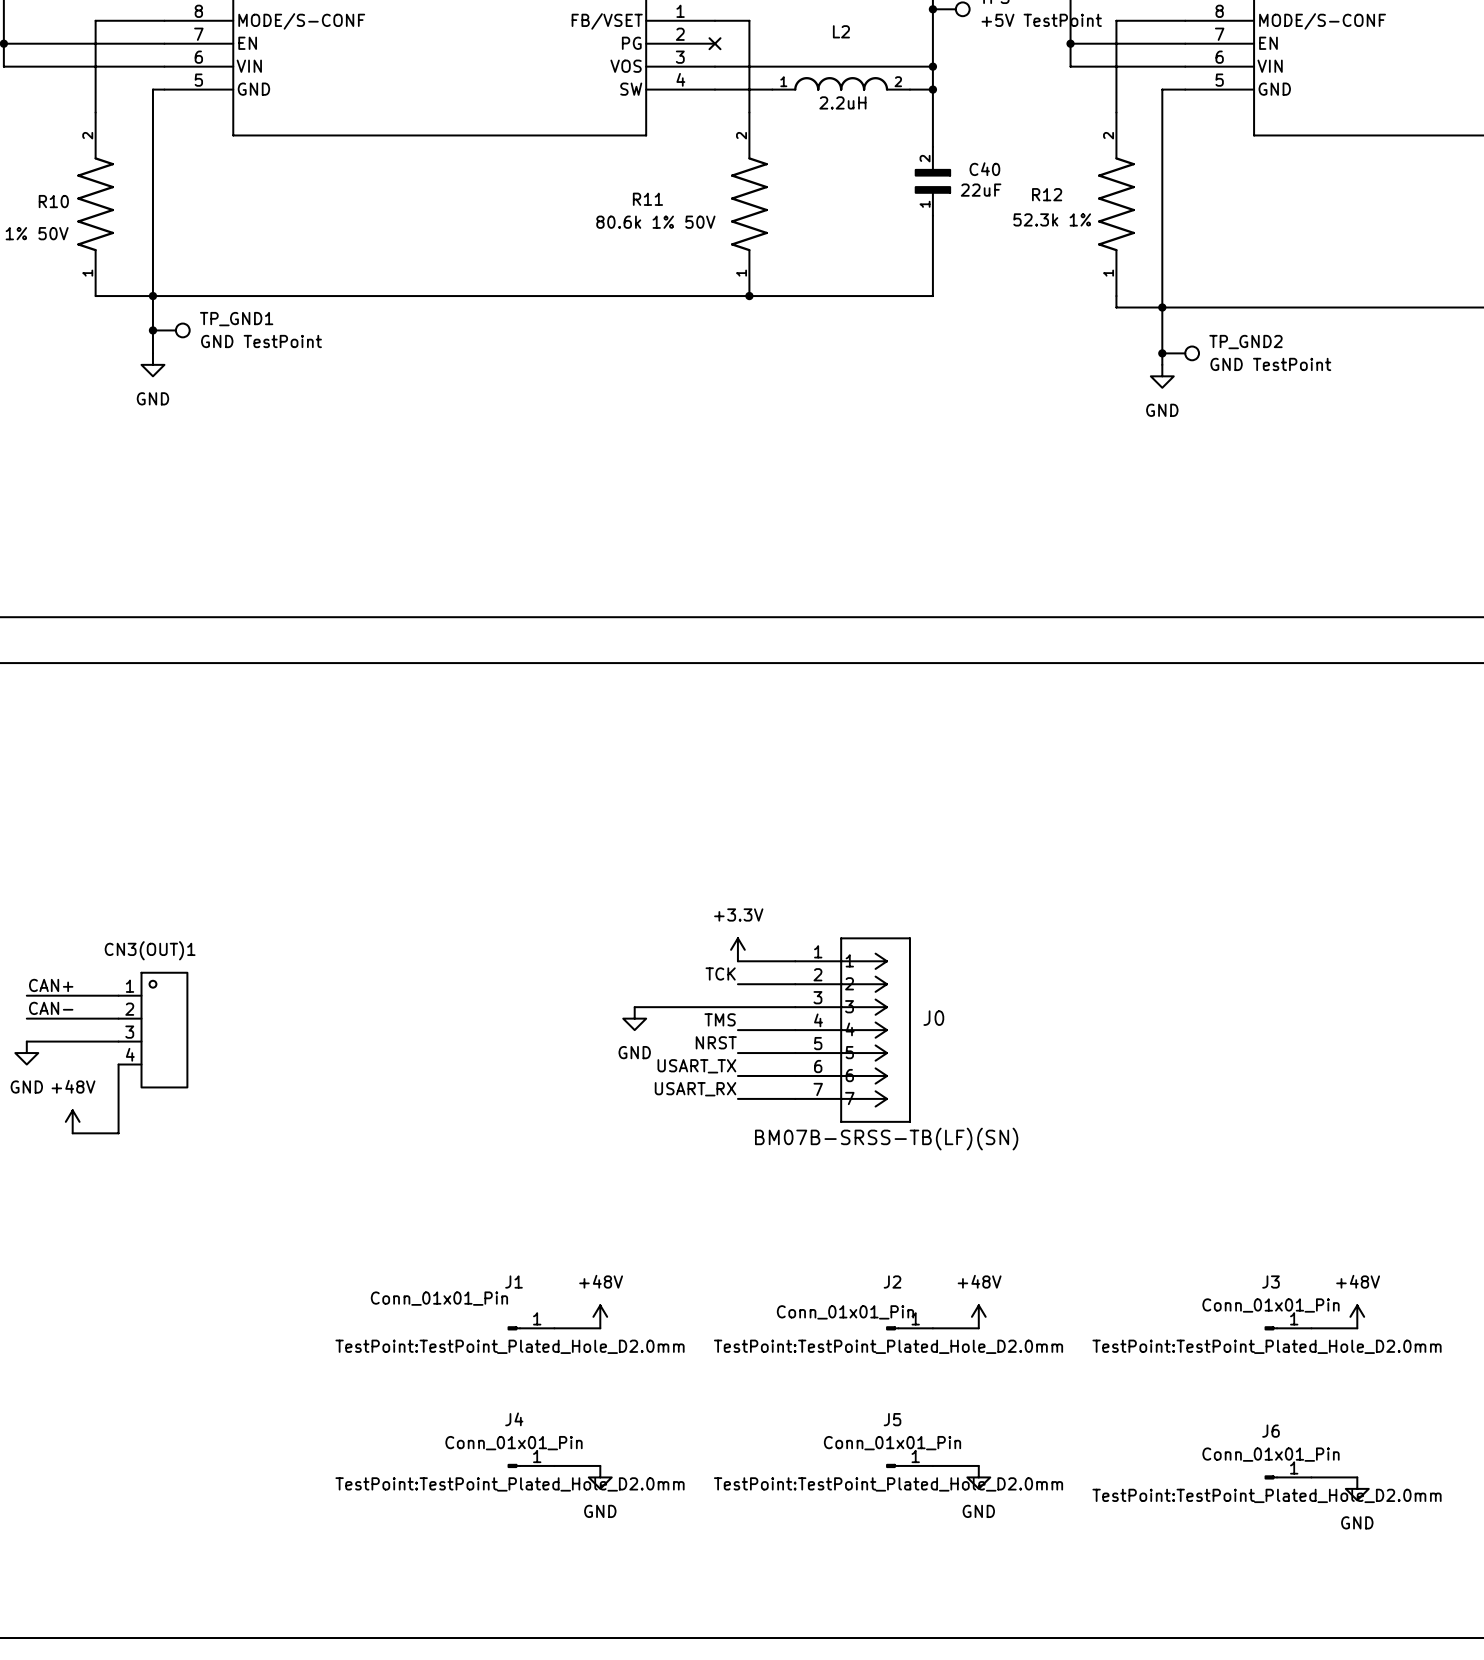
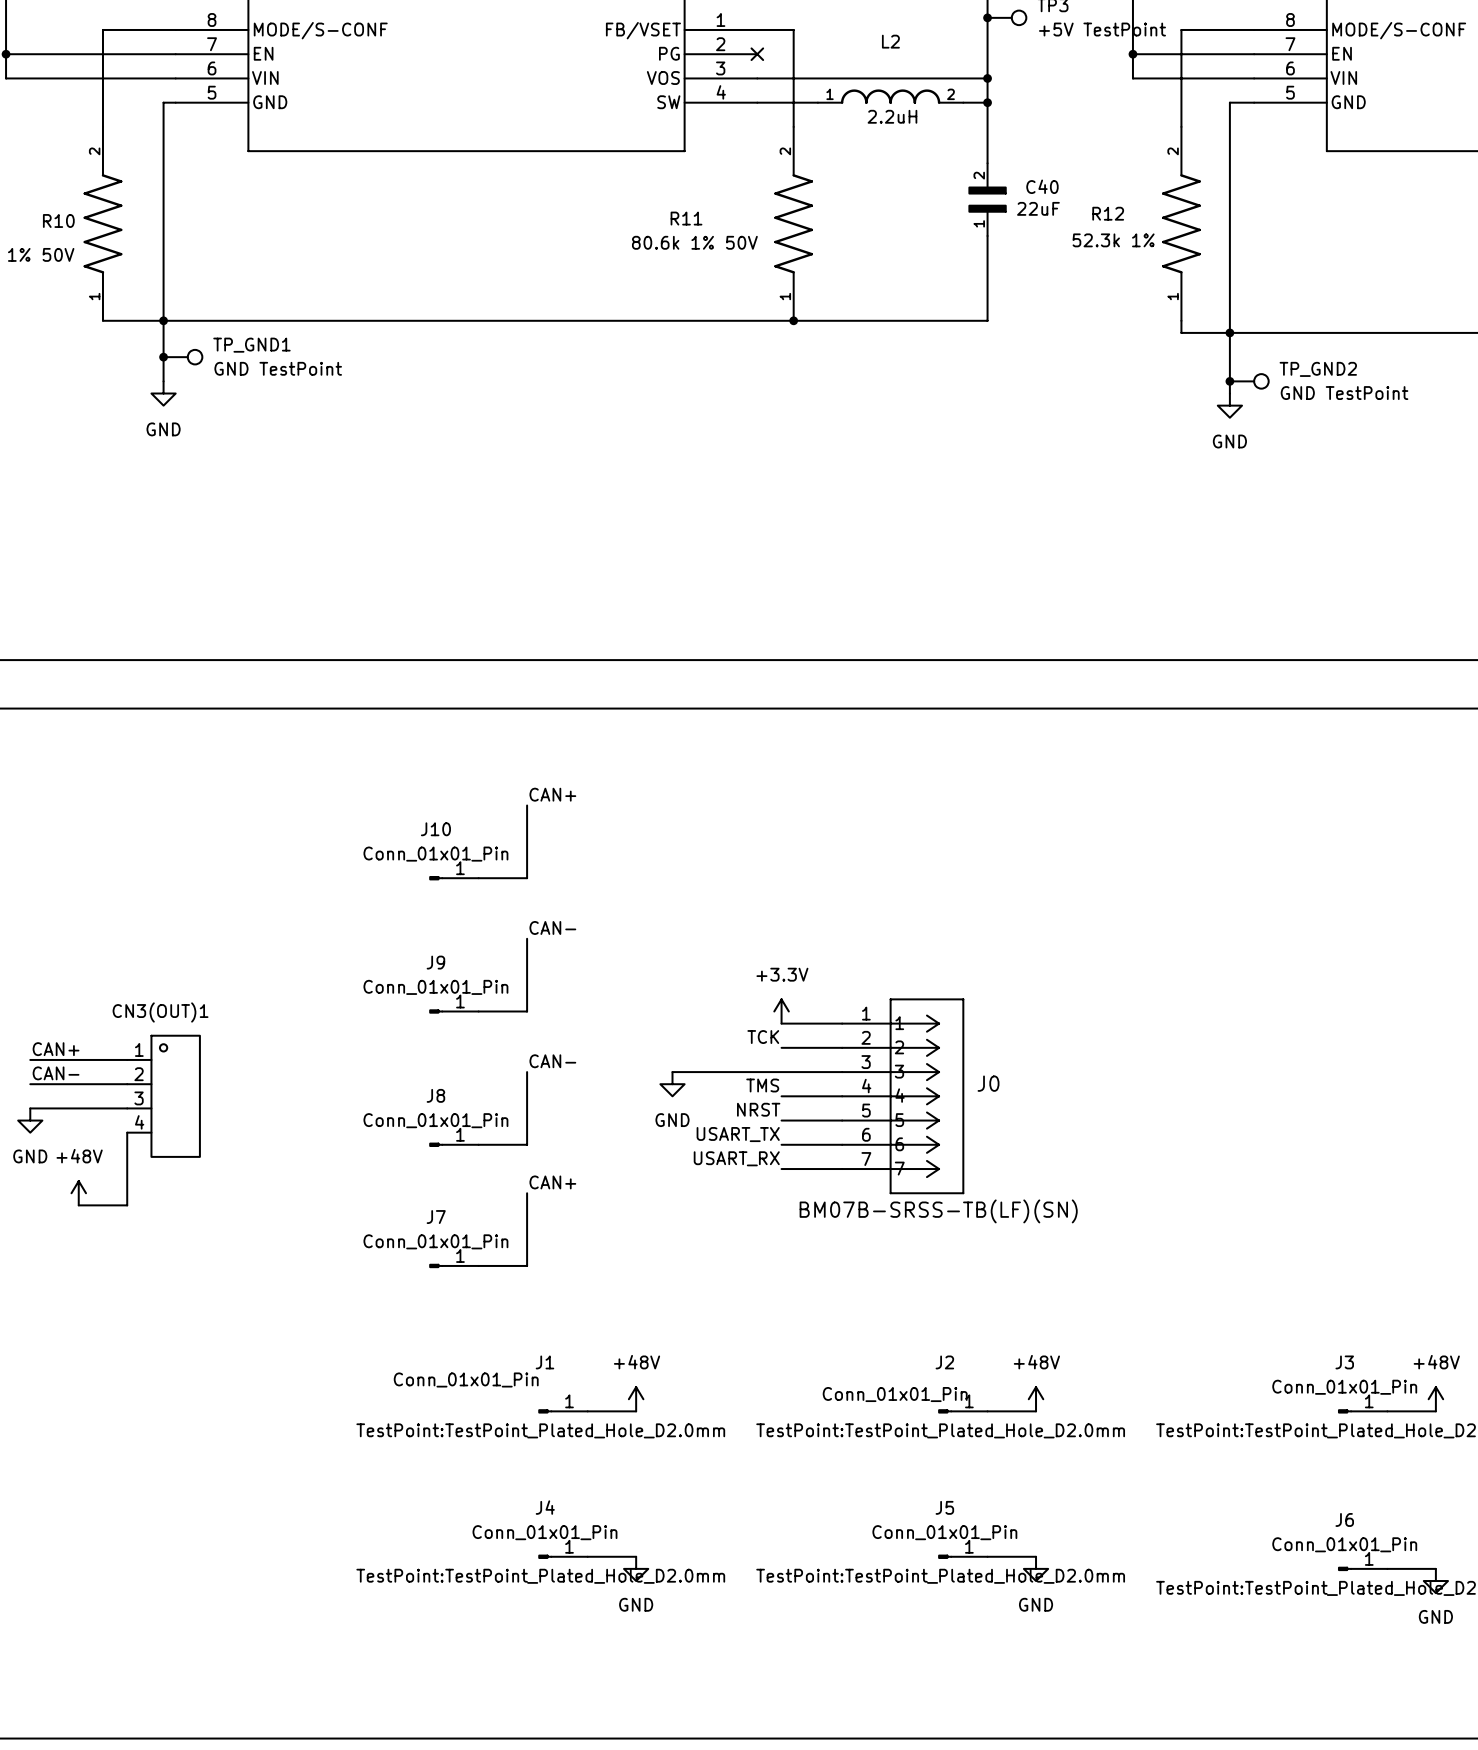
label: none -> CAN+ (552, 794)
wire: none -> (527, 805) (527, 878) (478, 878)
J10: none -> Conn_01x01_Pin (454, 878)
label: none -> CAN- (552, 927)
wire: none -> (527, 938) (527, 1011) (478, 1011)
J9: none -> Conn_01x01_Pin (454, 1011)
label: none -> CAN- (552, 1061)
wire: none -> (527, 1072) (527, 1144) (478, 1144)
J8: none -> Conn_01x01_Pin (454, 1144)
label: none -> CAN+ (552, 1182)
wire: none -> (527, 1193) (527, 1265) (478, 1265)
J7: none -> Conn_01x01_Pin (454, 1265)

